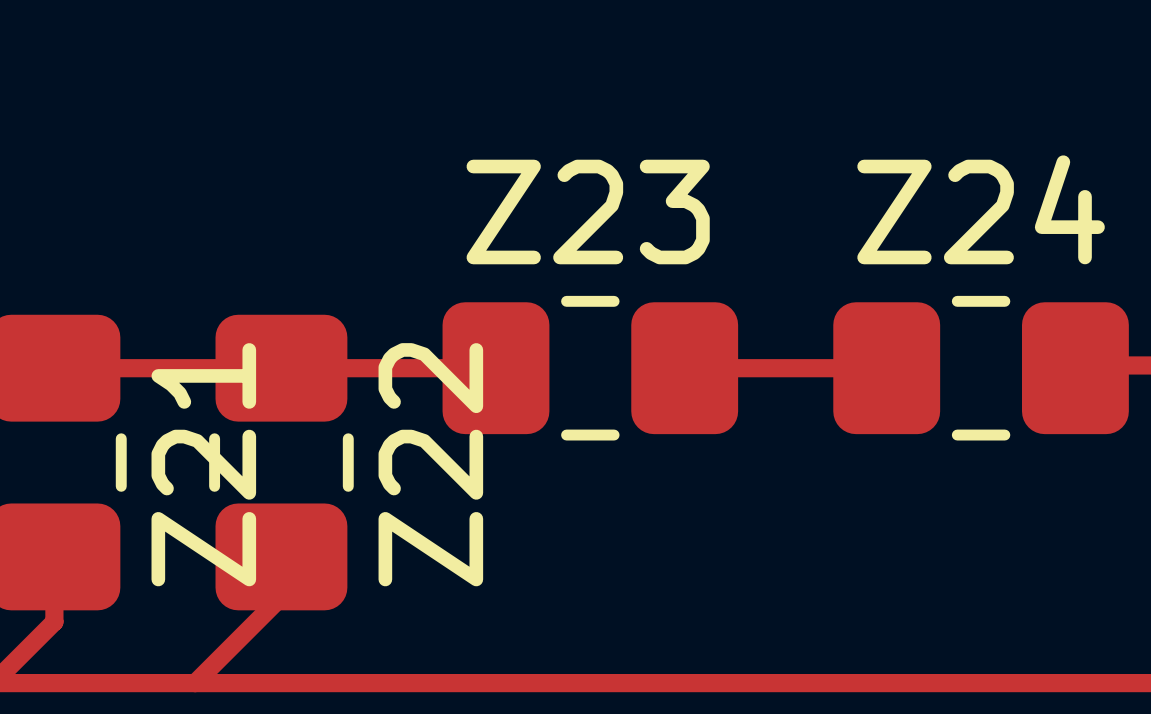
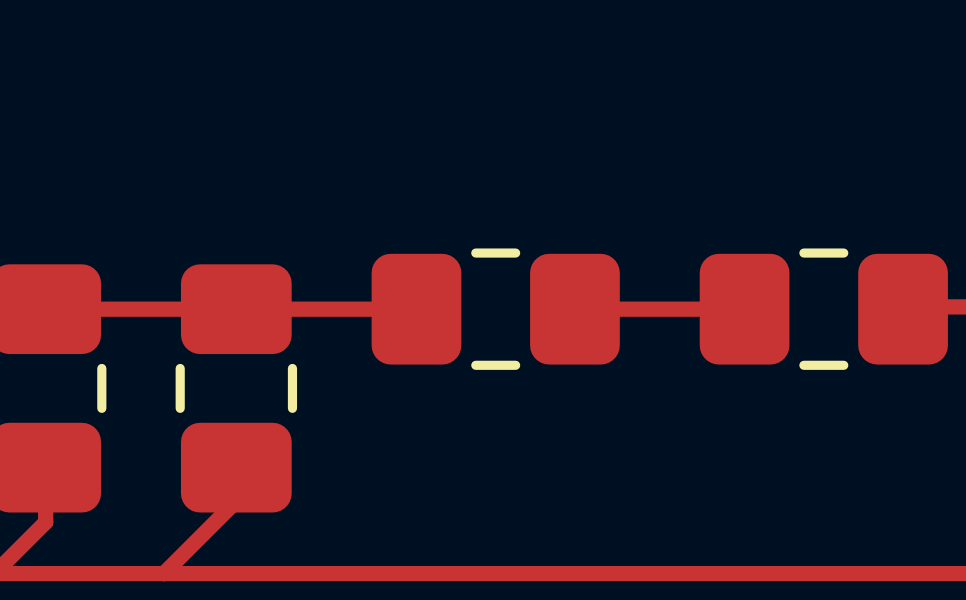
Z24 name: Z24 (981, 209) -> none
Z23 name: Z23 (588, 212) -> none
Z21 name: Z21 (203, 464) -> none
Z22 name: Z22 (430, 464) -> none

